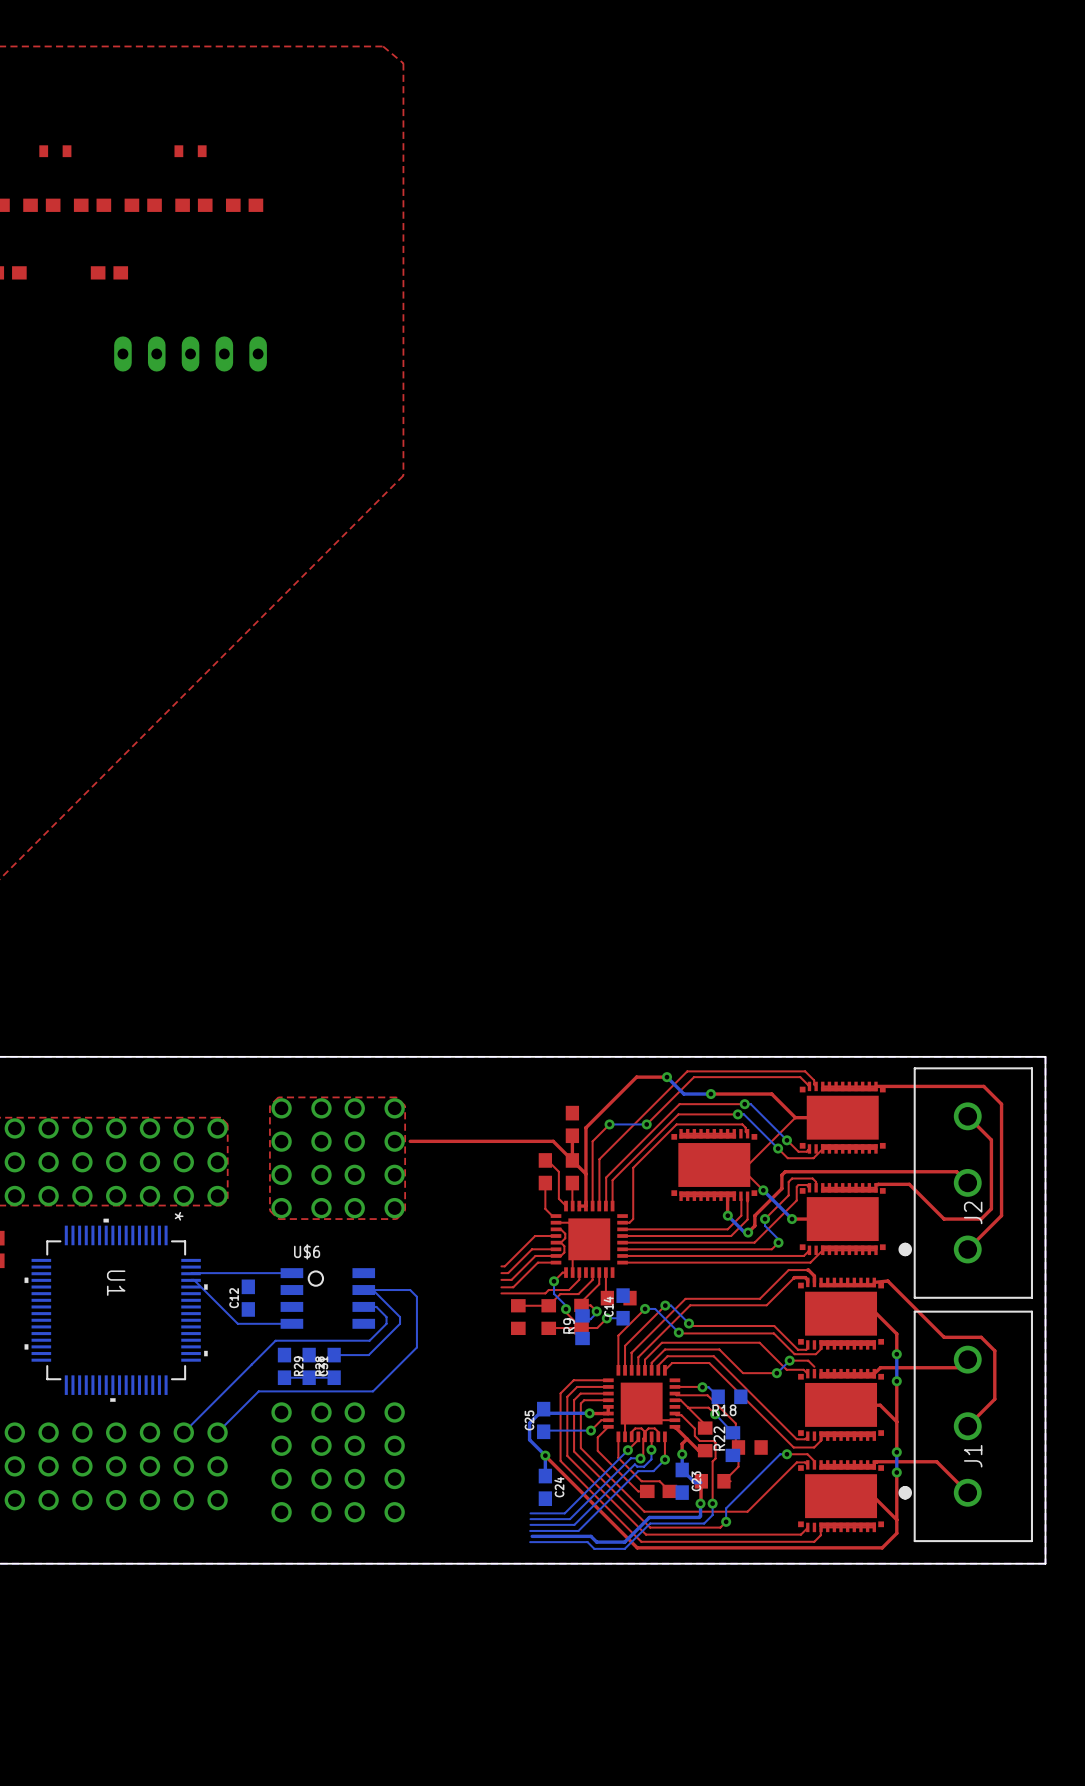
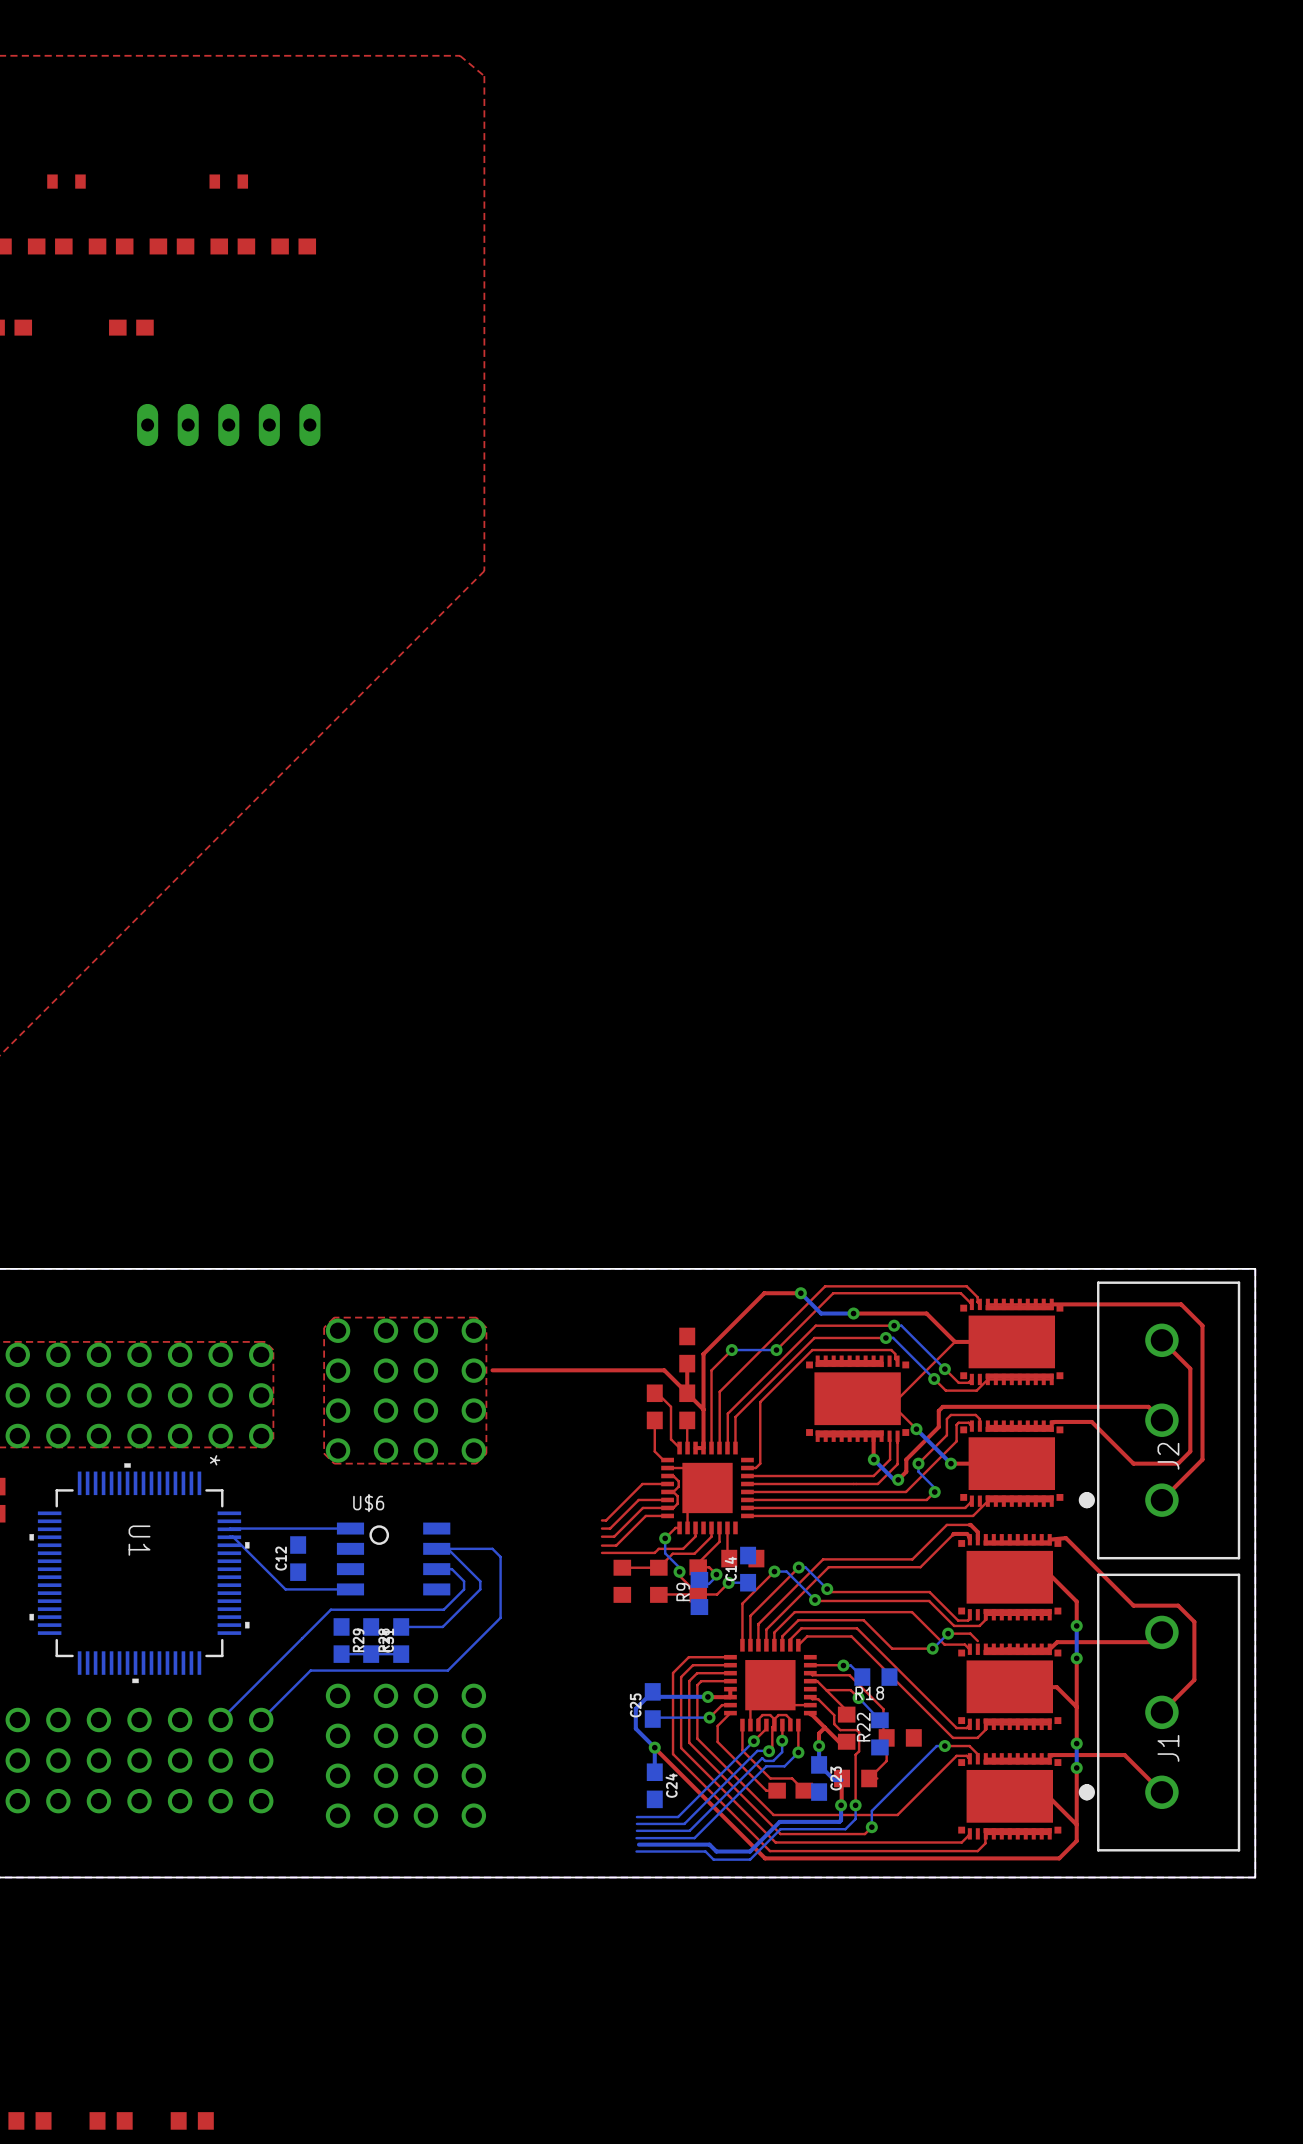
part: none -> (29, 2120)
part: none -> (111, 2120)
part: none -> (192, 2120)

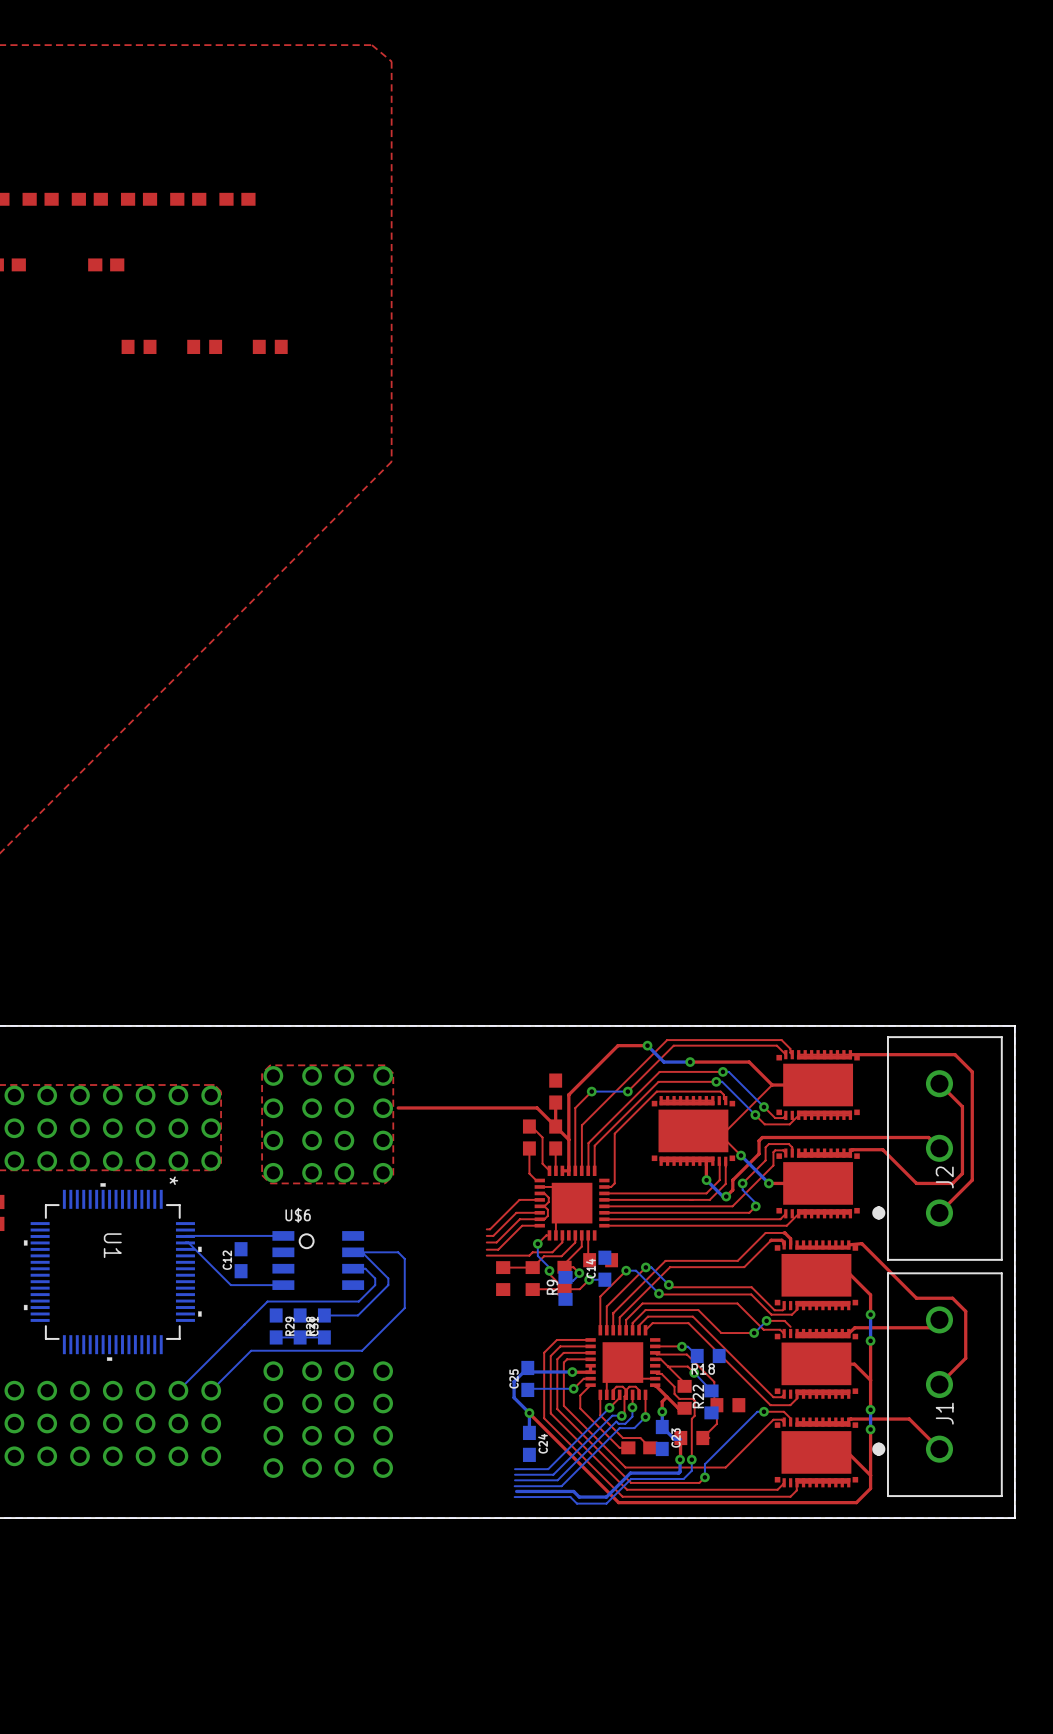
part: (66, 181) -> none
part: (228, 181) -> none
part: (228, 424) -> none
part: none -> (139, 346)
part: none -> (204, 346)
part: none -> (270, 346)
part: (29, 2120) -> none
part: (111, 2120) -> none
part: (192, 2120) -> none

